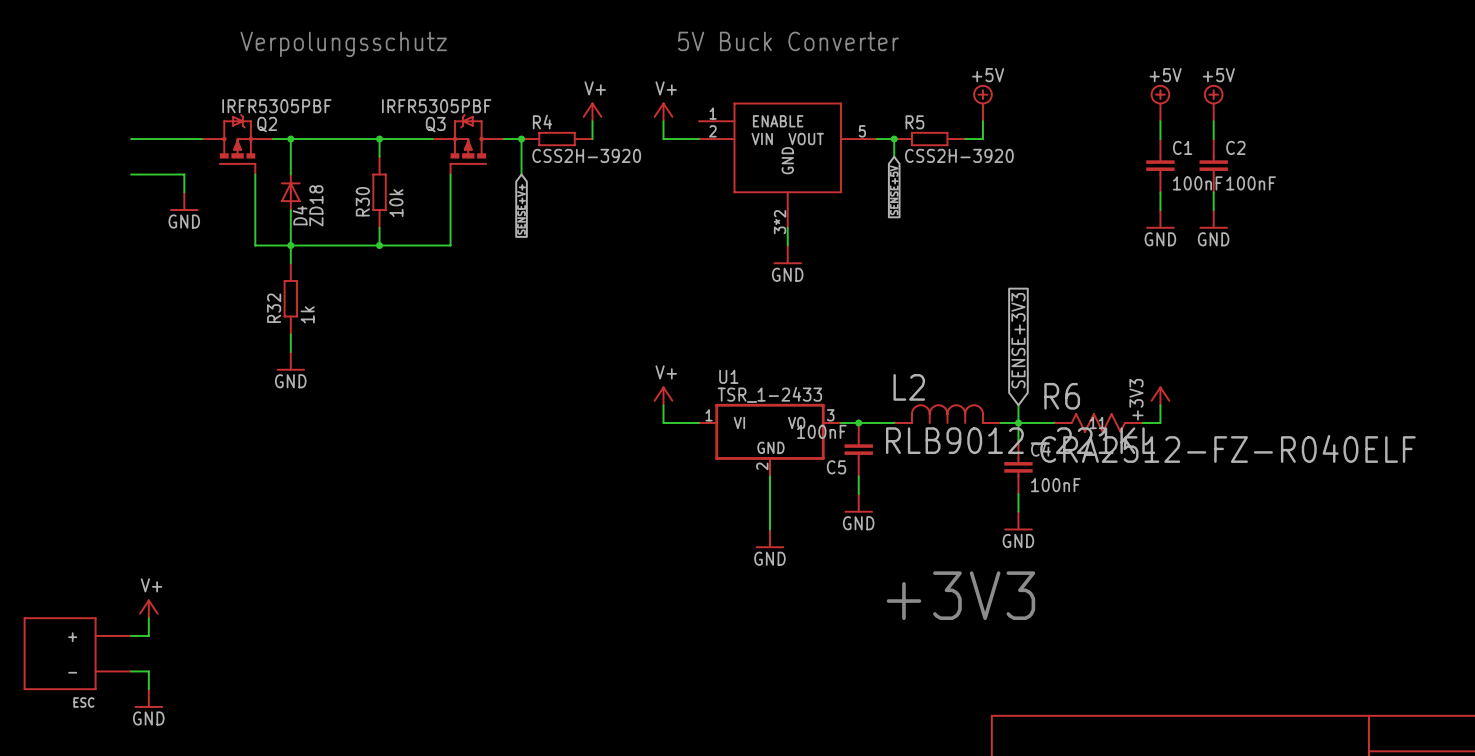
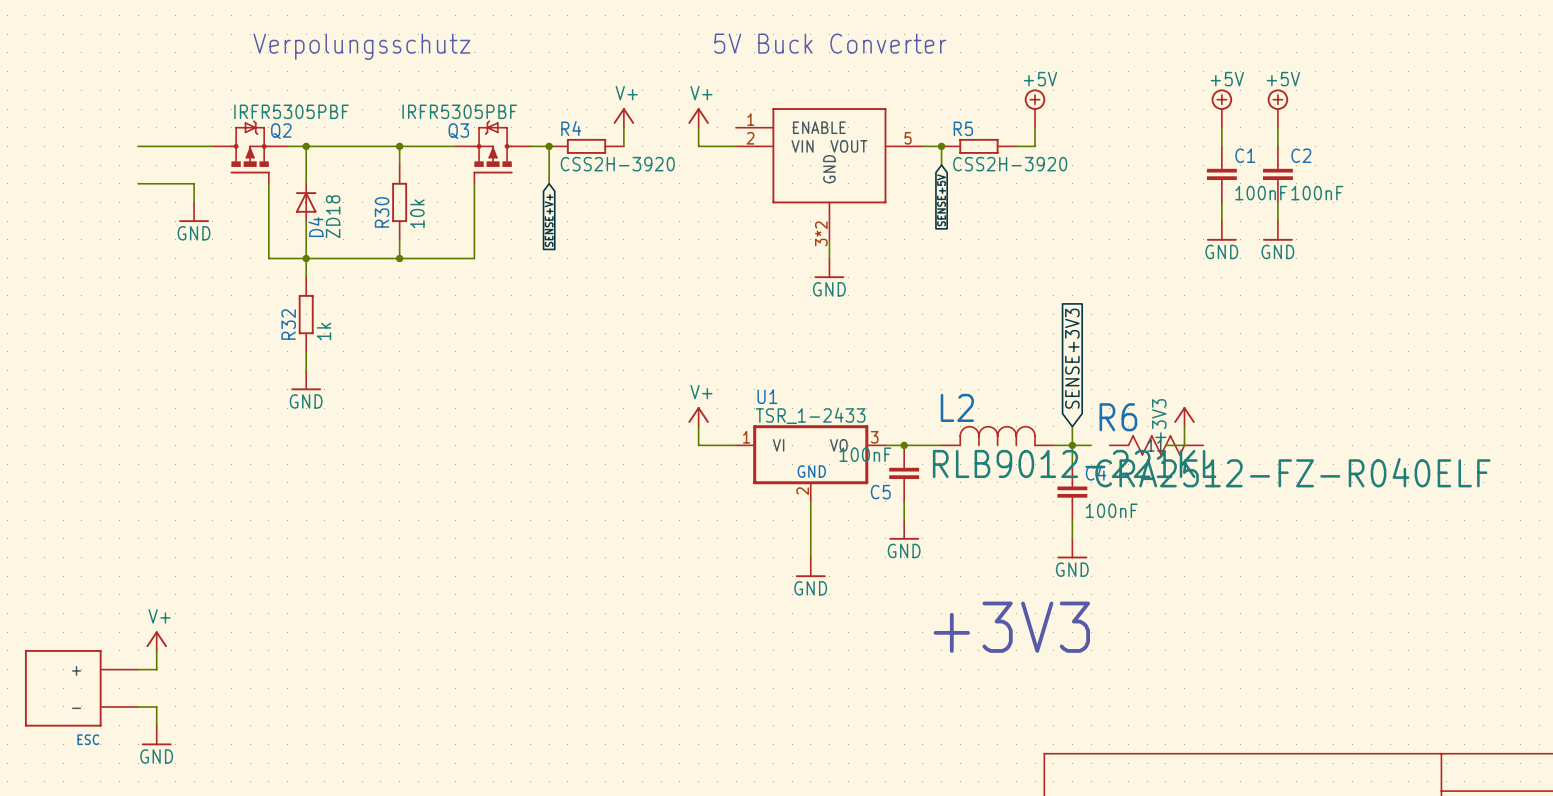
power symbol position: +3V3 (1160, 395) -> +3V3 (1184, 416)
wire: (1160, 405) (1160, 422) (1142, 422) -> (1184, 426) (1184, 445) (1165, 445)
wire: (1036, 422) (1053, 422) -> none

